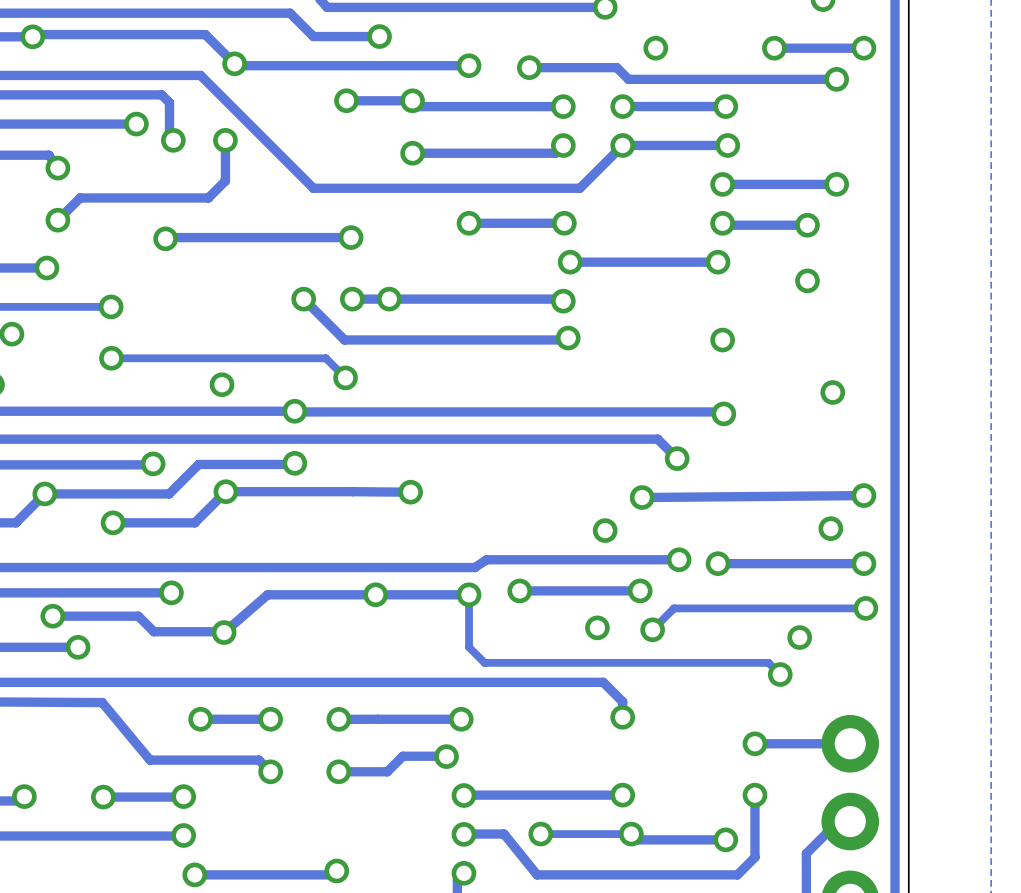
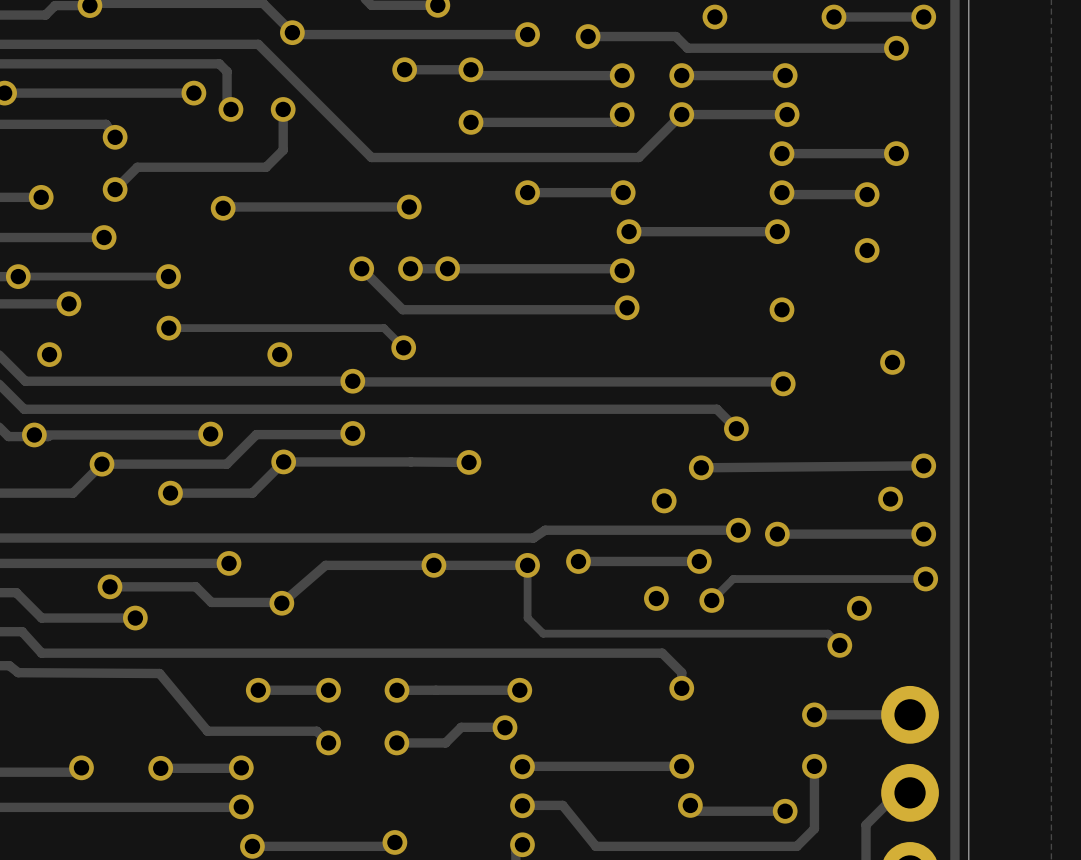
via: (540, 834) -> none
track: (631, 834) (540, 834) -> none

